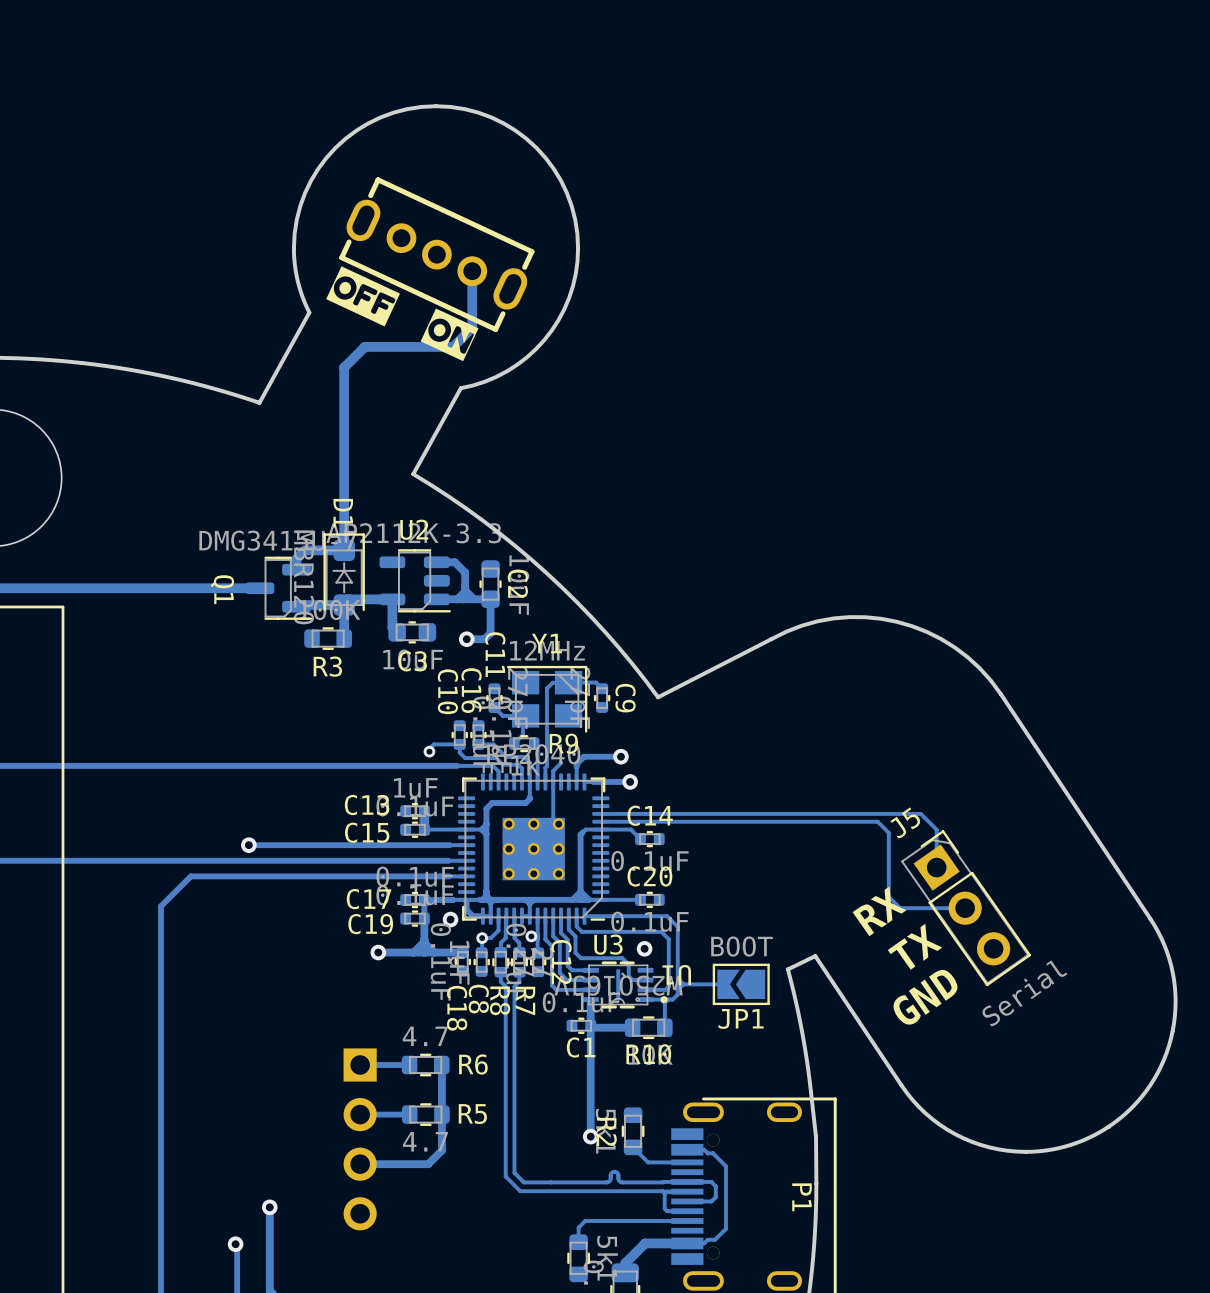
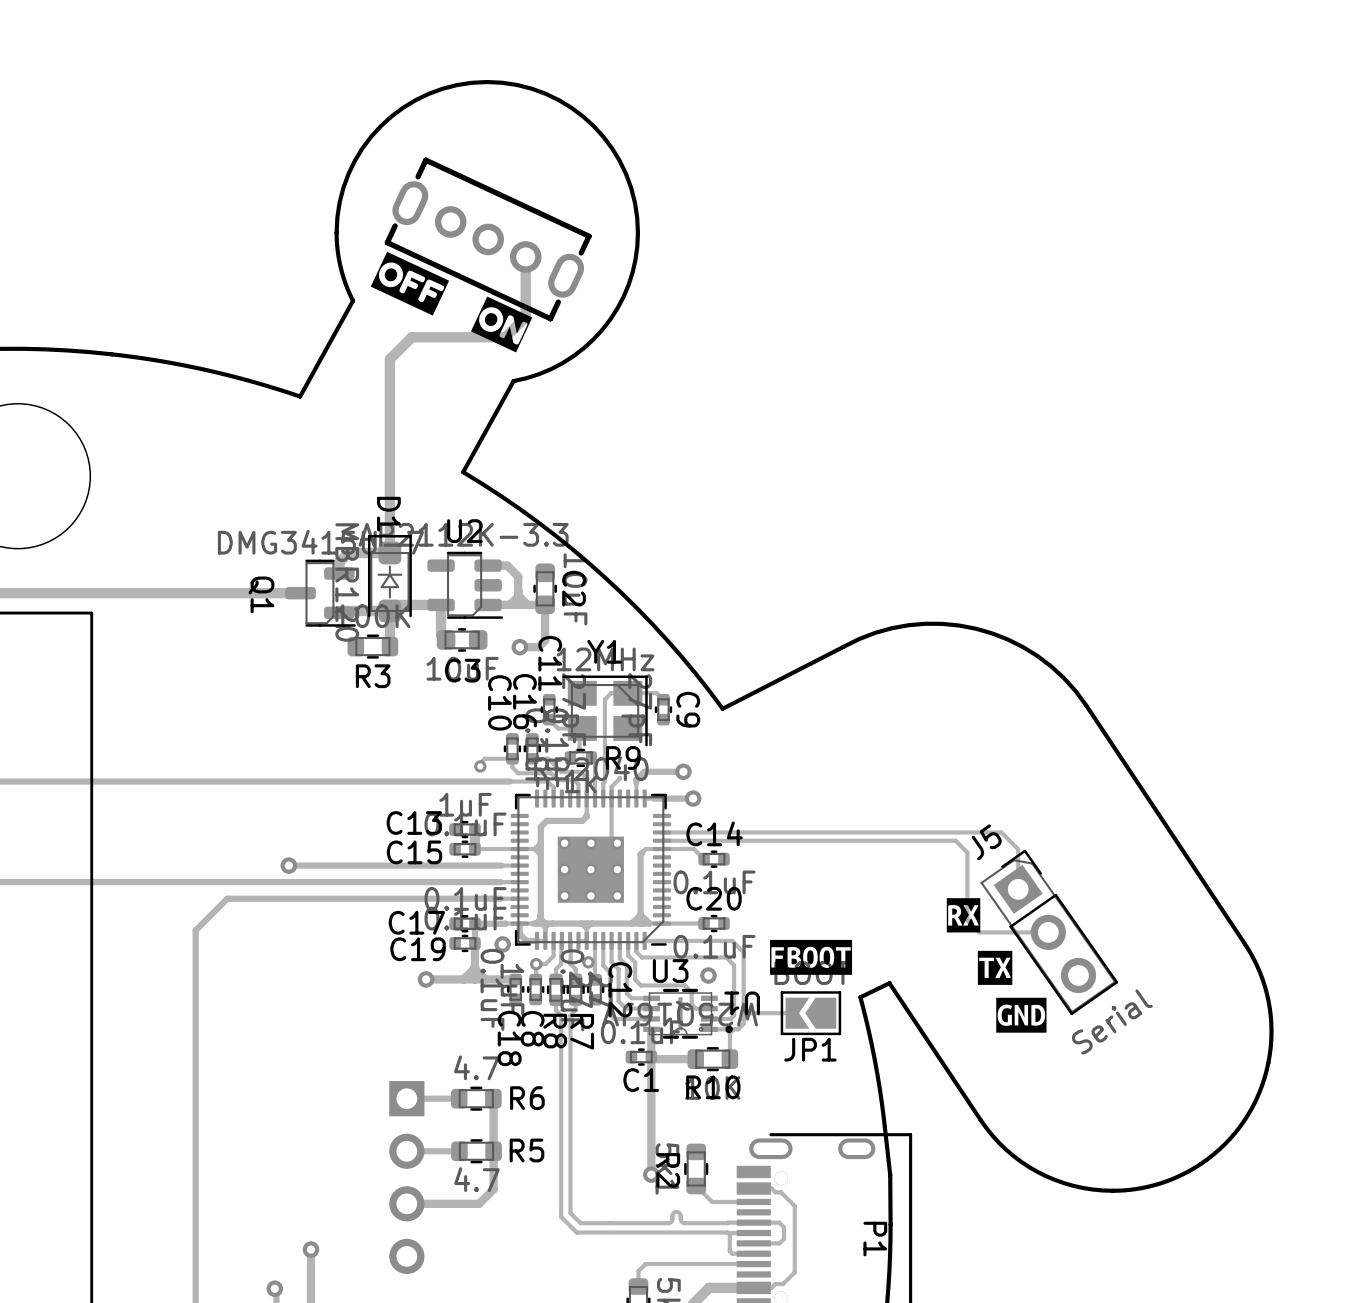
drawing: none -> [946, 898, 1047, 1033]
text: RX (879, 911) -> none
drawing: none -> [770, 939, 853, 975]
text: TX (915, 946) -> none
text: GND (925, 997) -> none

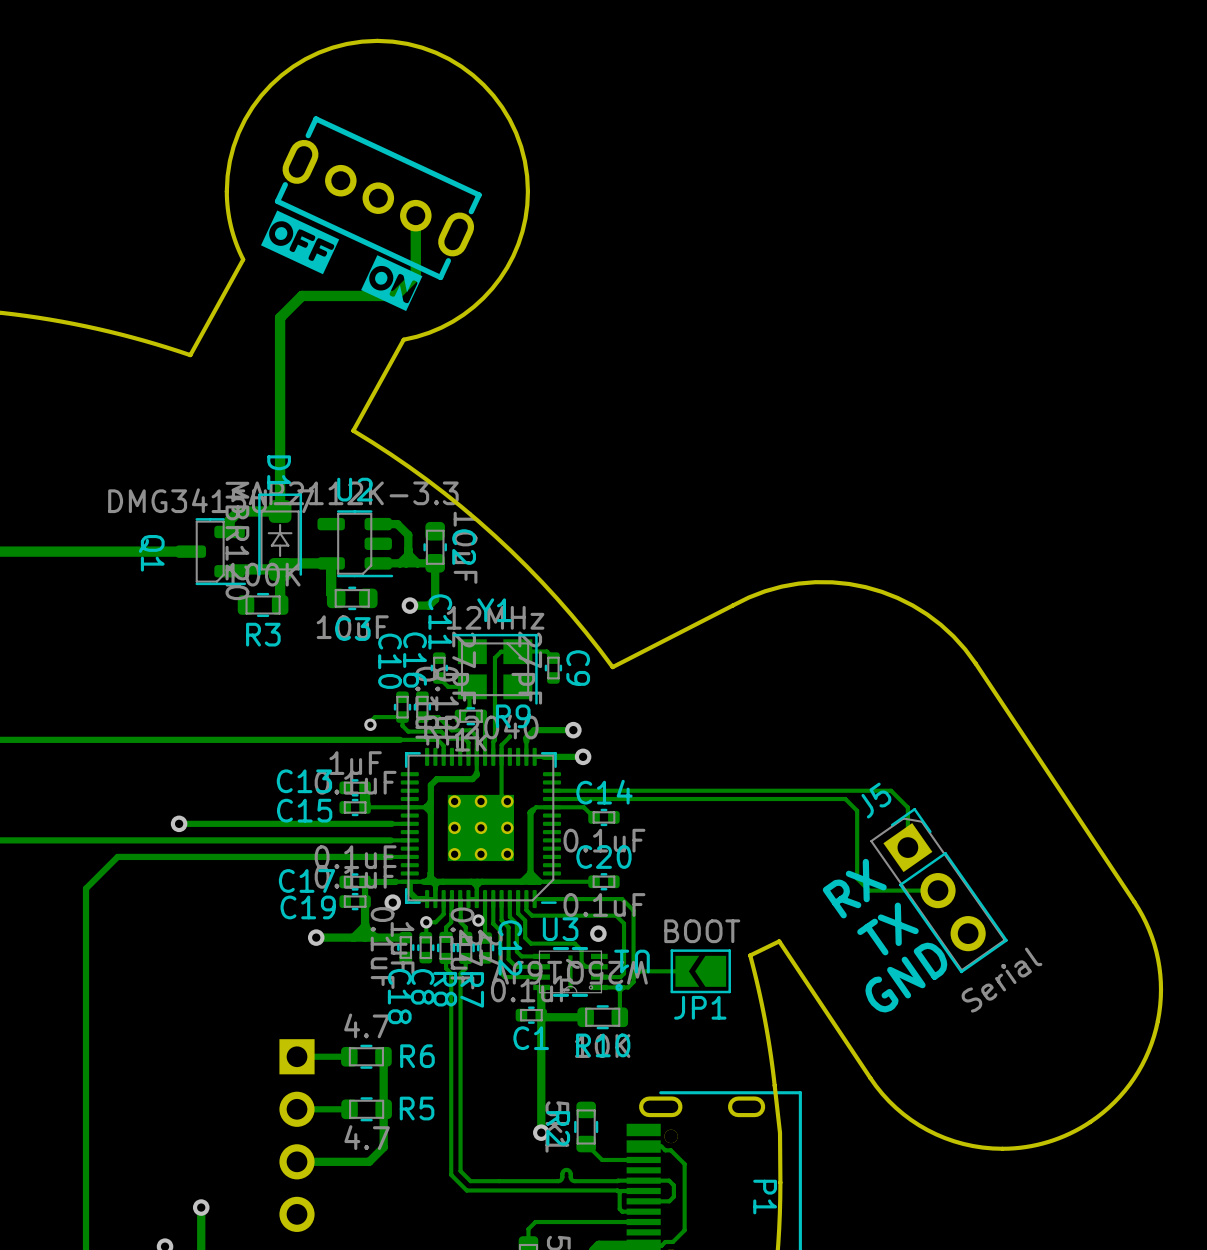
drawing: [946, 898, 1047, 1033] -> none
text: none -> RX (854, 888)
drawing: [770, 939, 853, 975] -> none
text: none -> TX (887, 928)
text: none -> GND (906, 977)

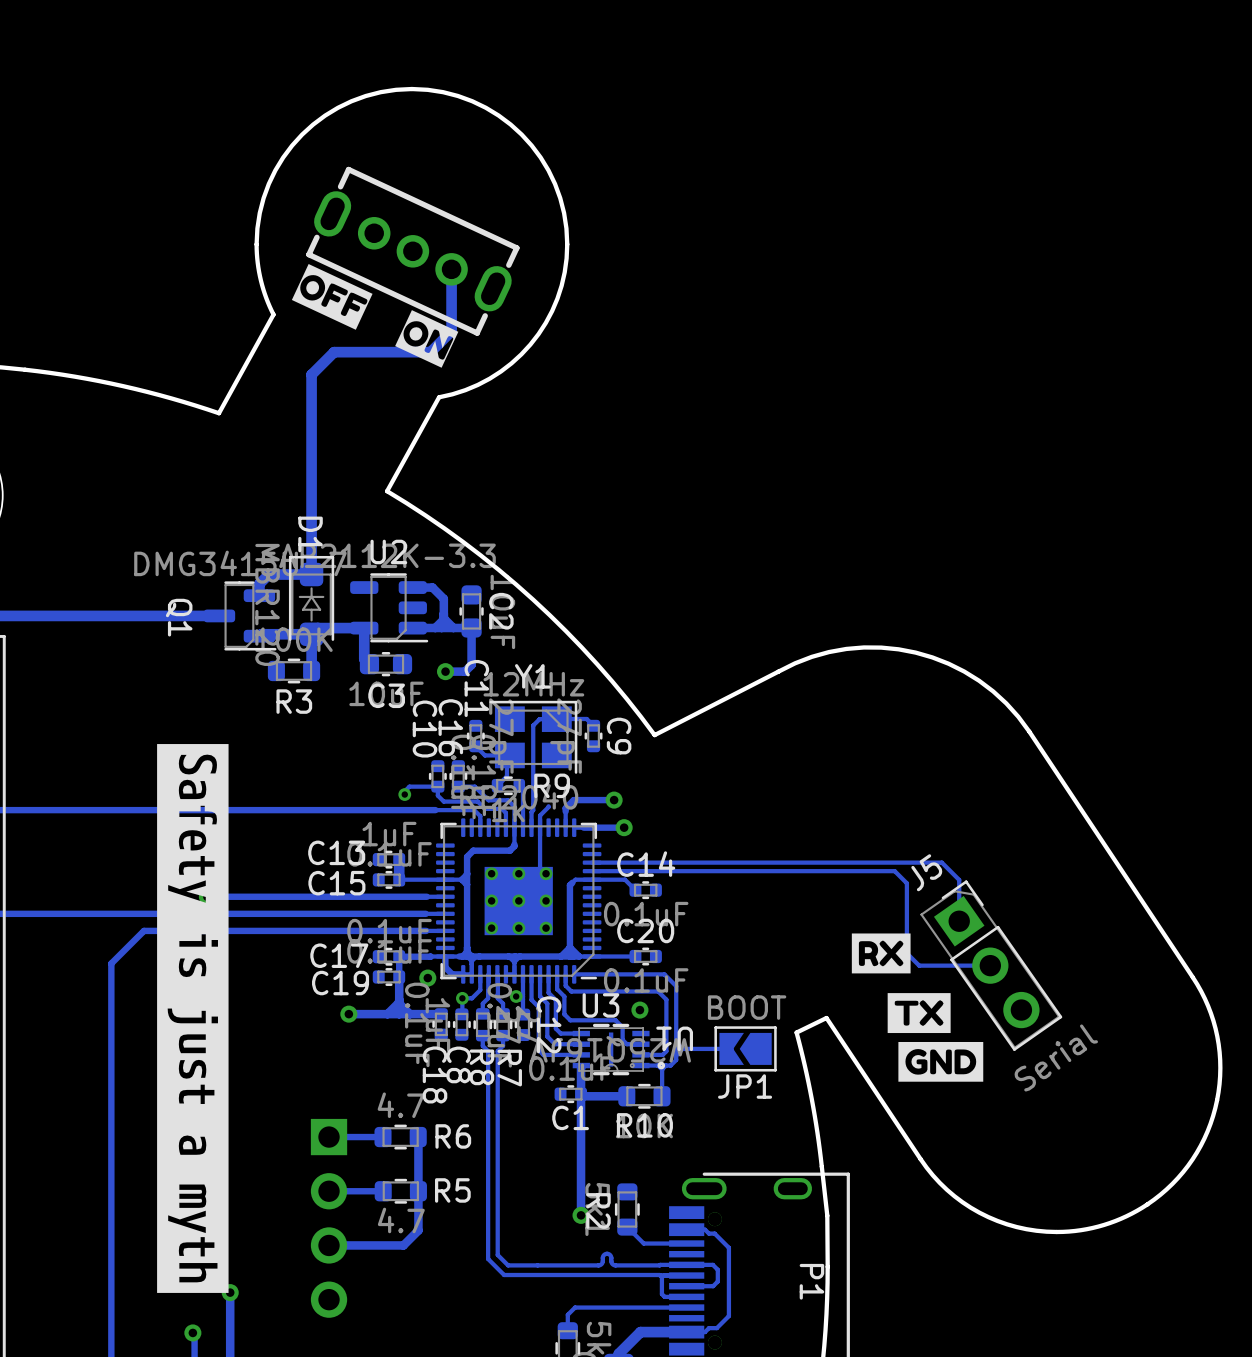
drawing: none -> [157, 744, 229, 1293]
drawing: none -> [851, 933, 984, 1082]
text: RX (854, 888) -> none
text: TX (887, 928) -> none
text: GND (906, 977) -> none

